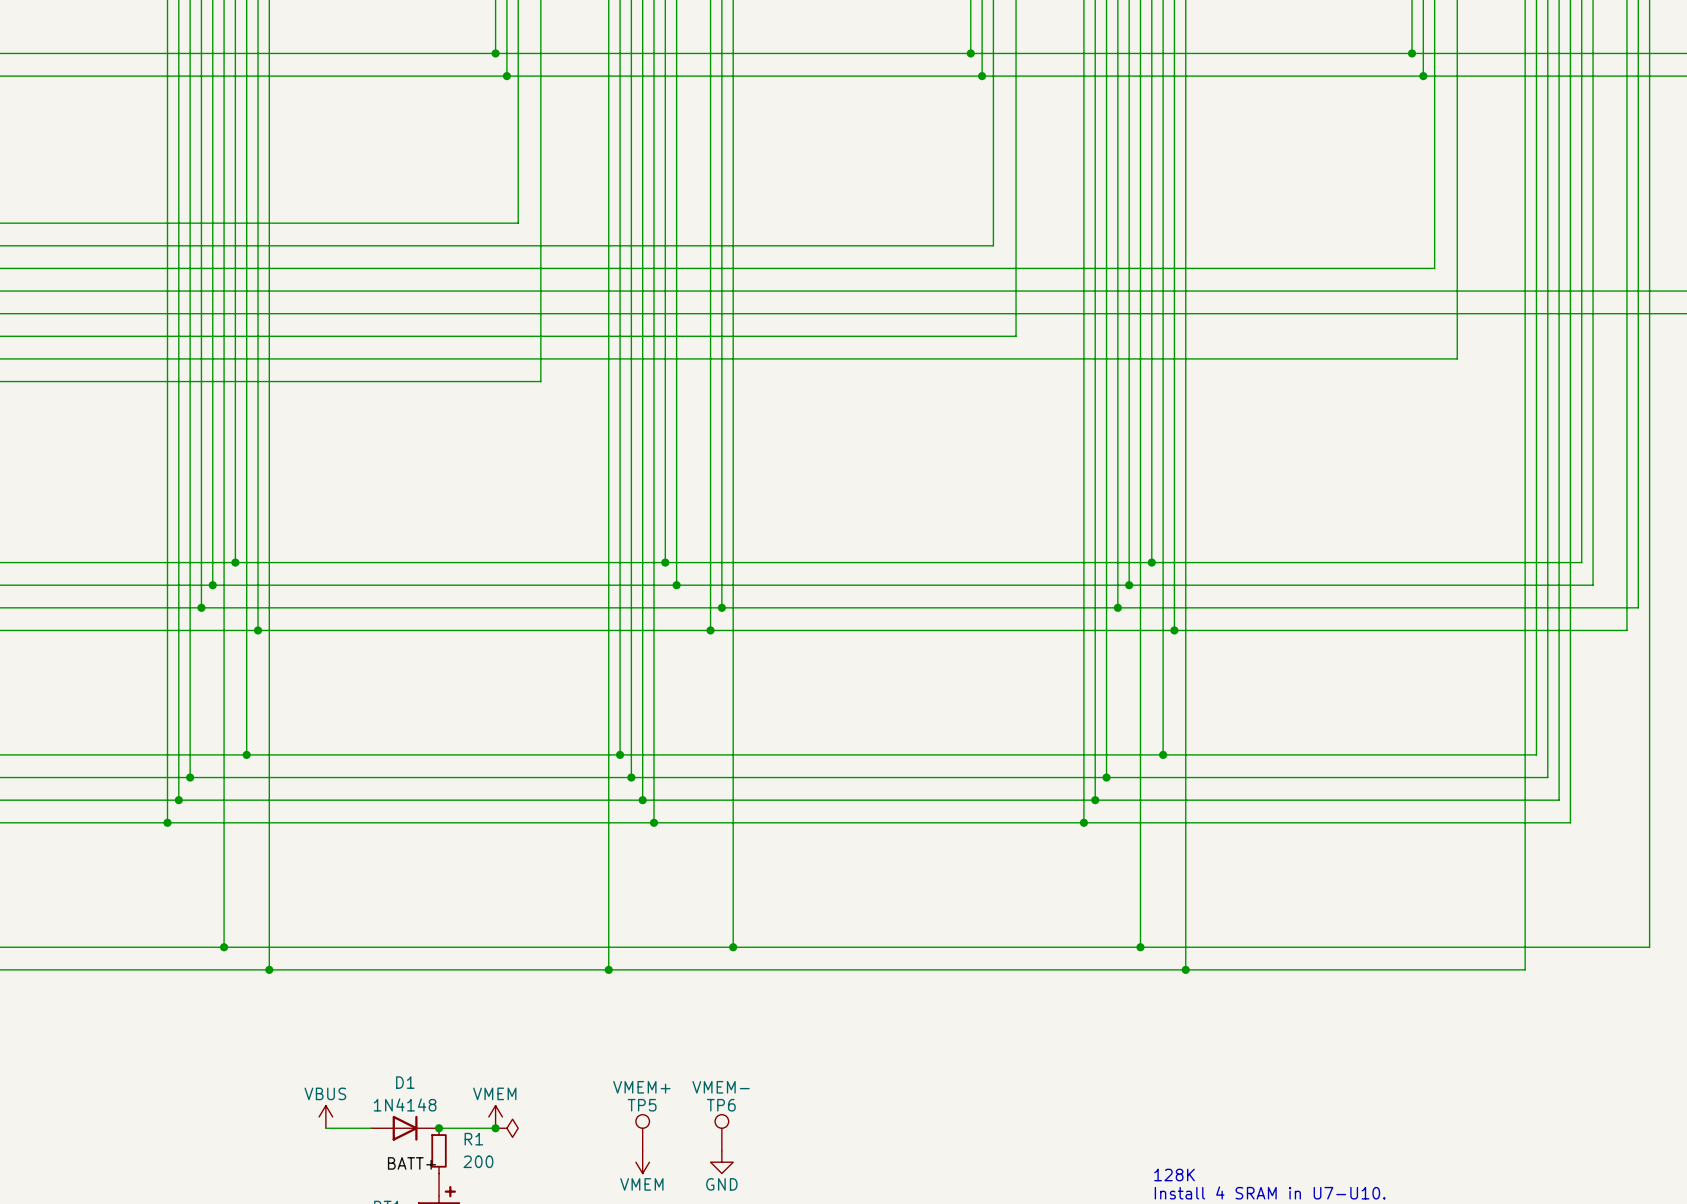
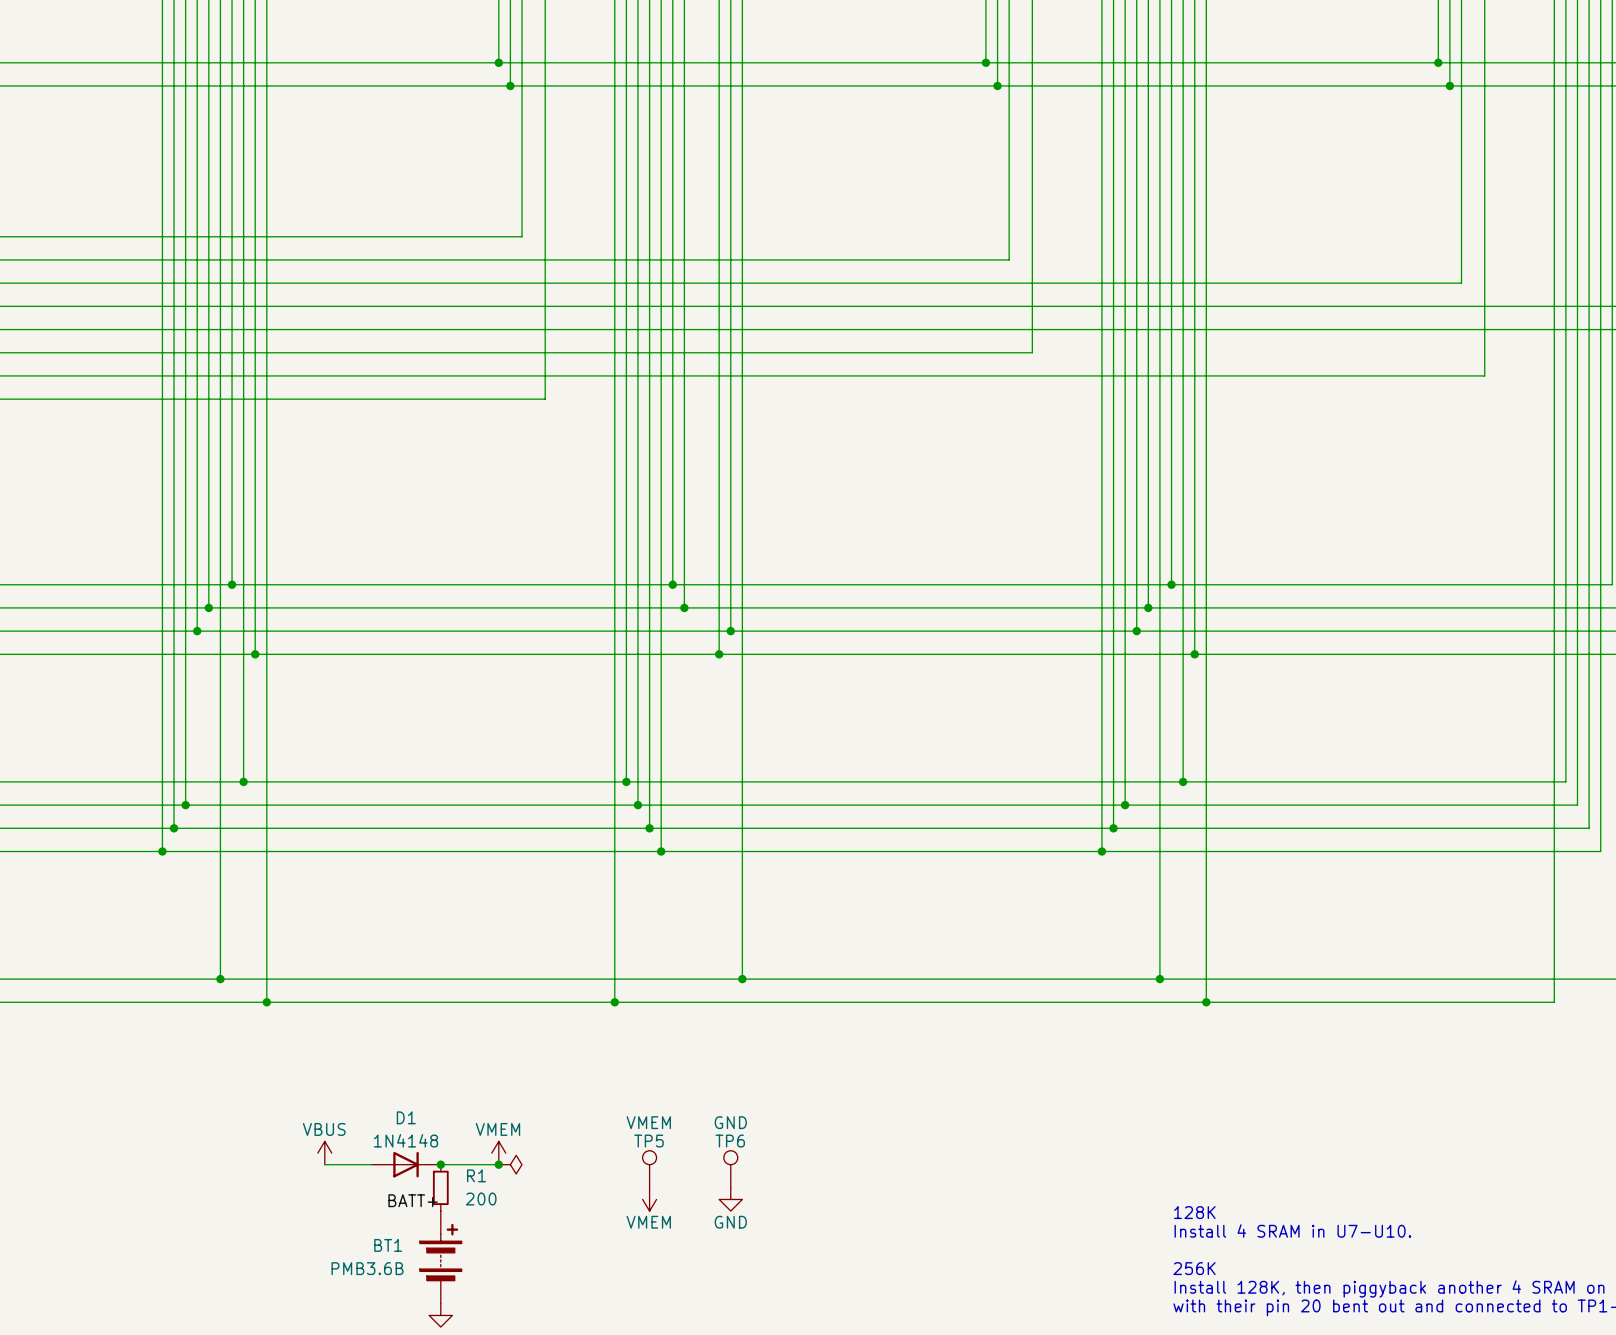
TP5 value: VMEM+ (641, 1087) -> VMEM (648, 1122)
TP6 value: VMEM- (721, 1087) -> GND (730, 1122)

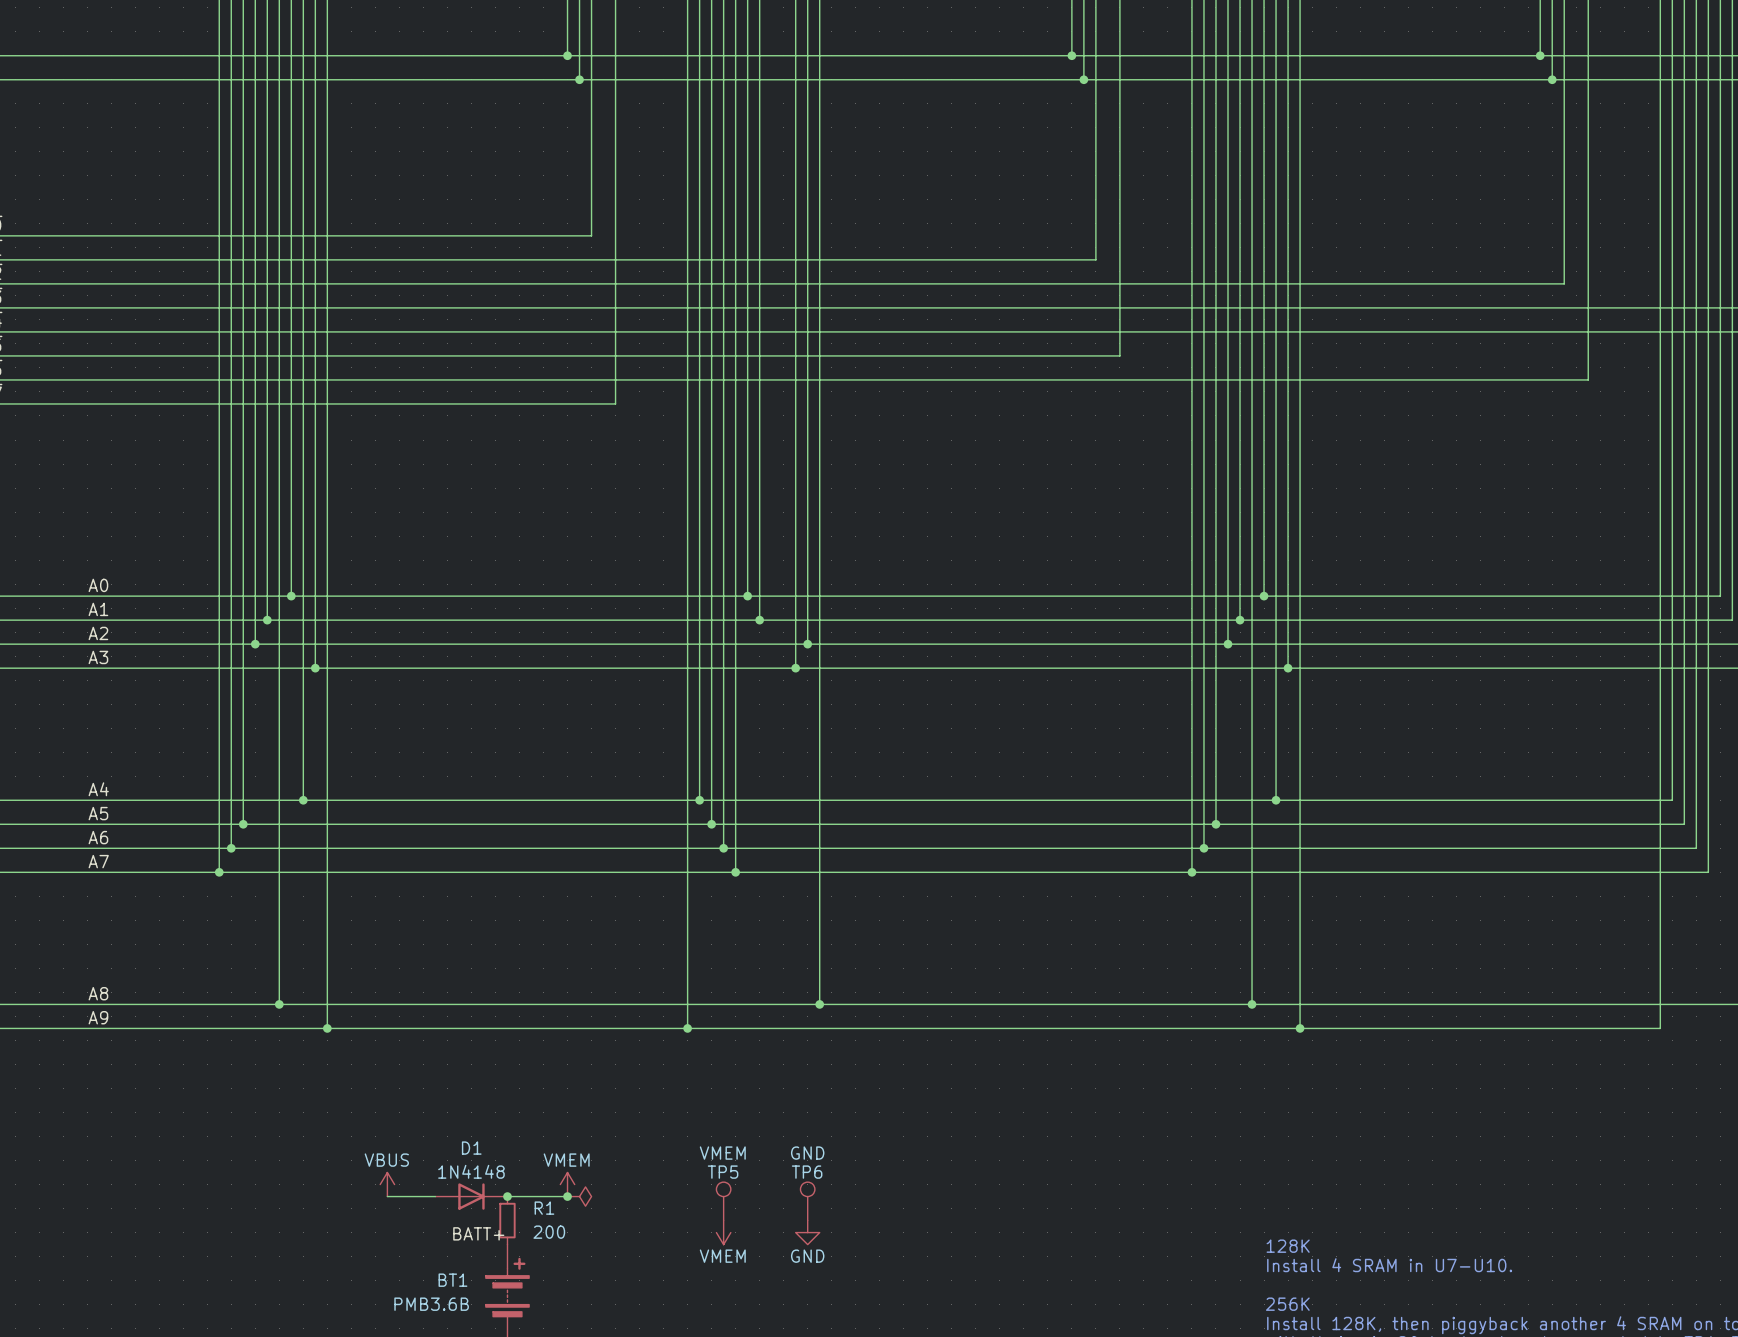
label: none -> A0 (98, 585)
label: none -> A1 (98, 609)
label: none -> A2 (98, 633)
label: none -> A3 (98, 657)
label: none -> A4 (98, 789)
label: none -> A5 (98, 813)
label: none -> A6 (98, 837)
label: none -> A7 (98, 861)
label: none -> A8 (98, 993)
label: none -> A9 (98, 1017)

